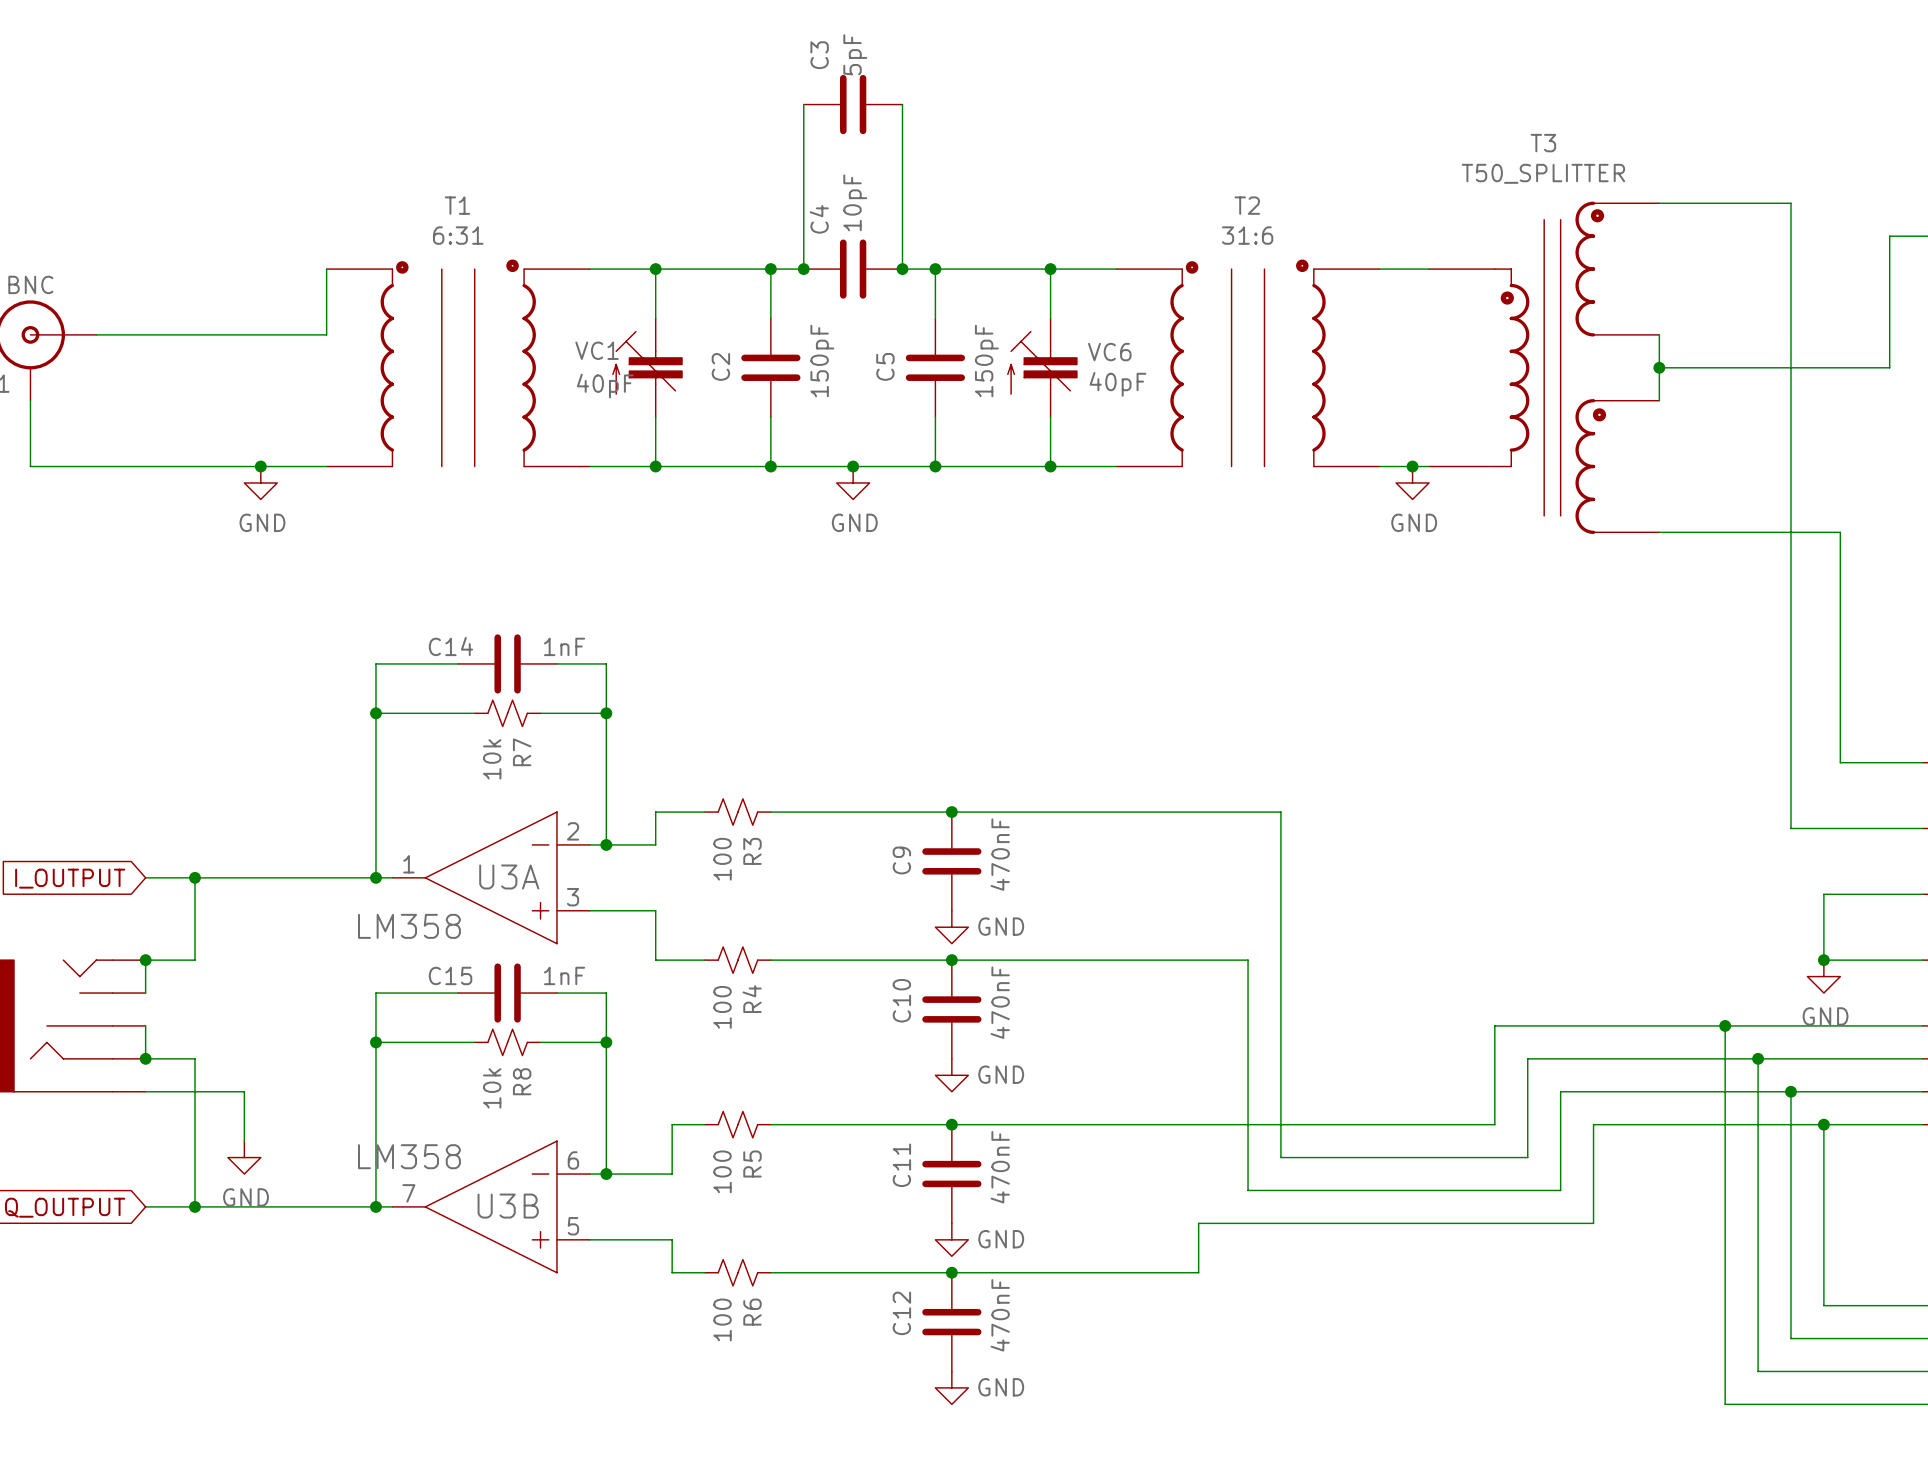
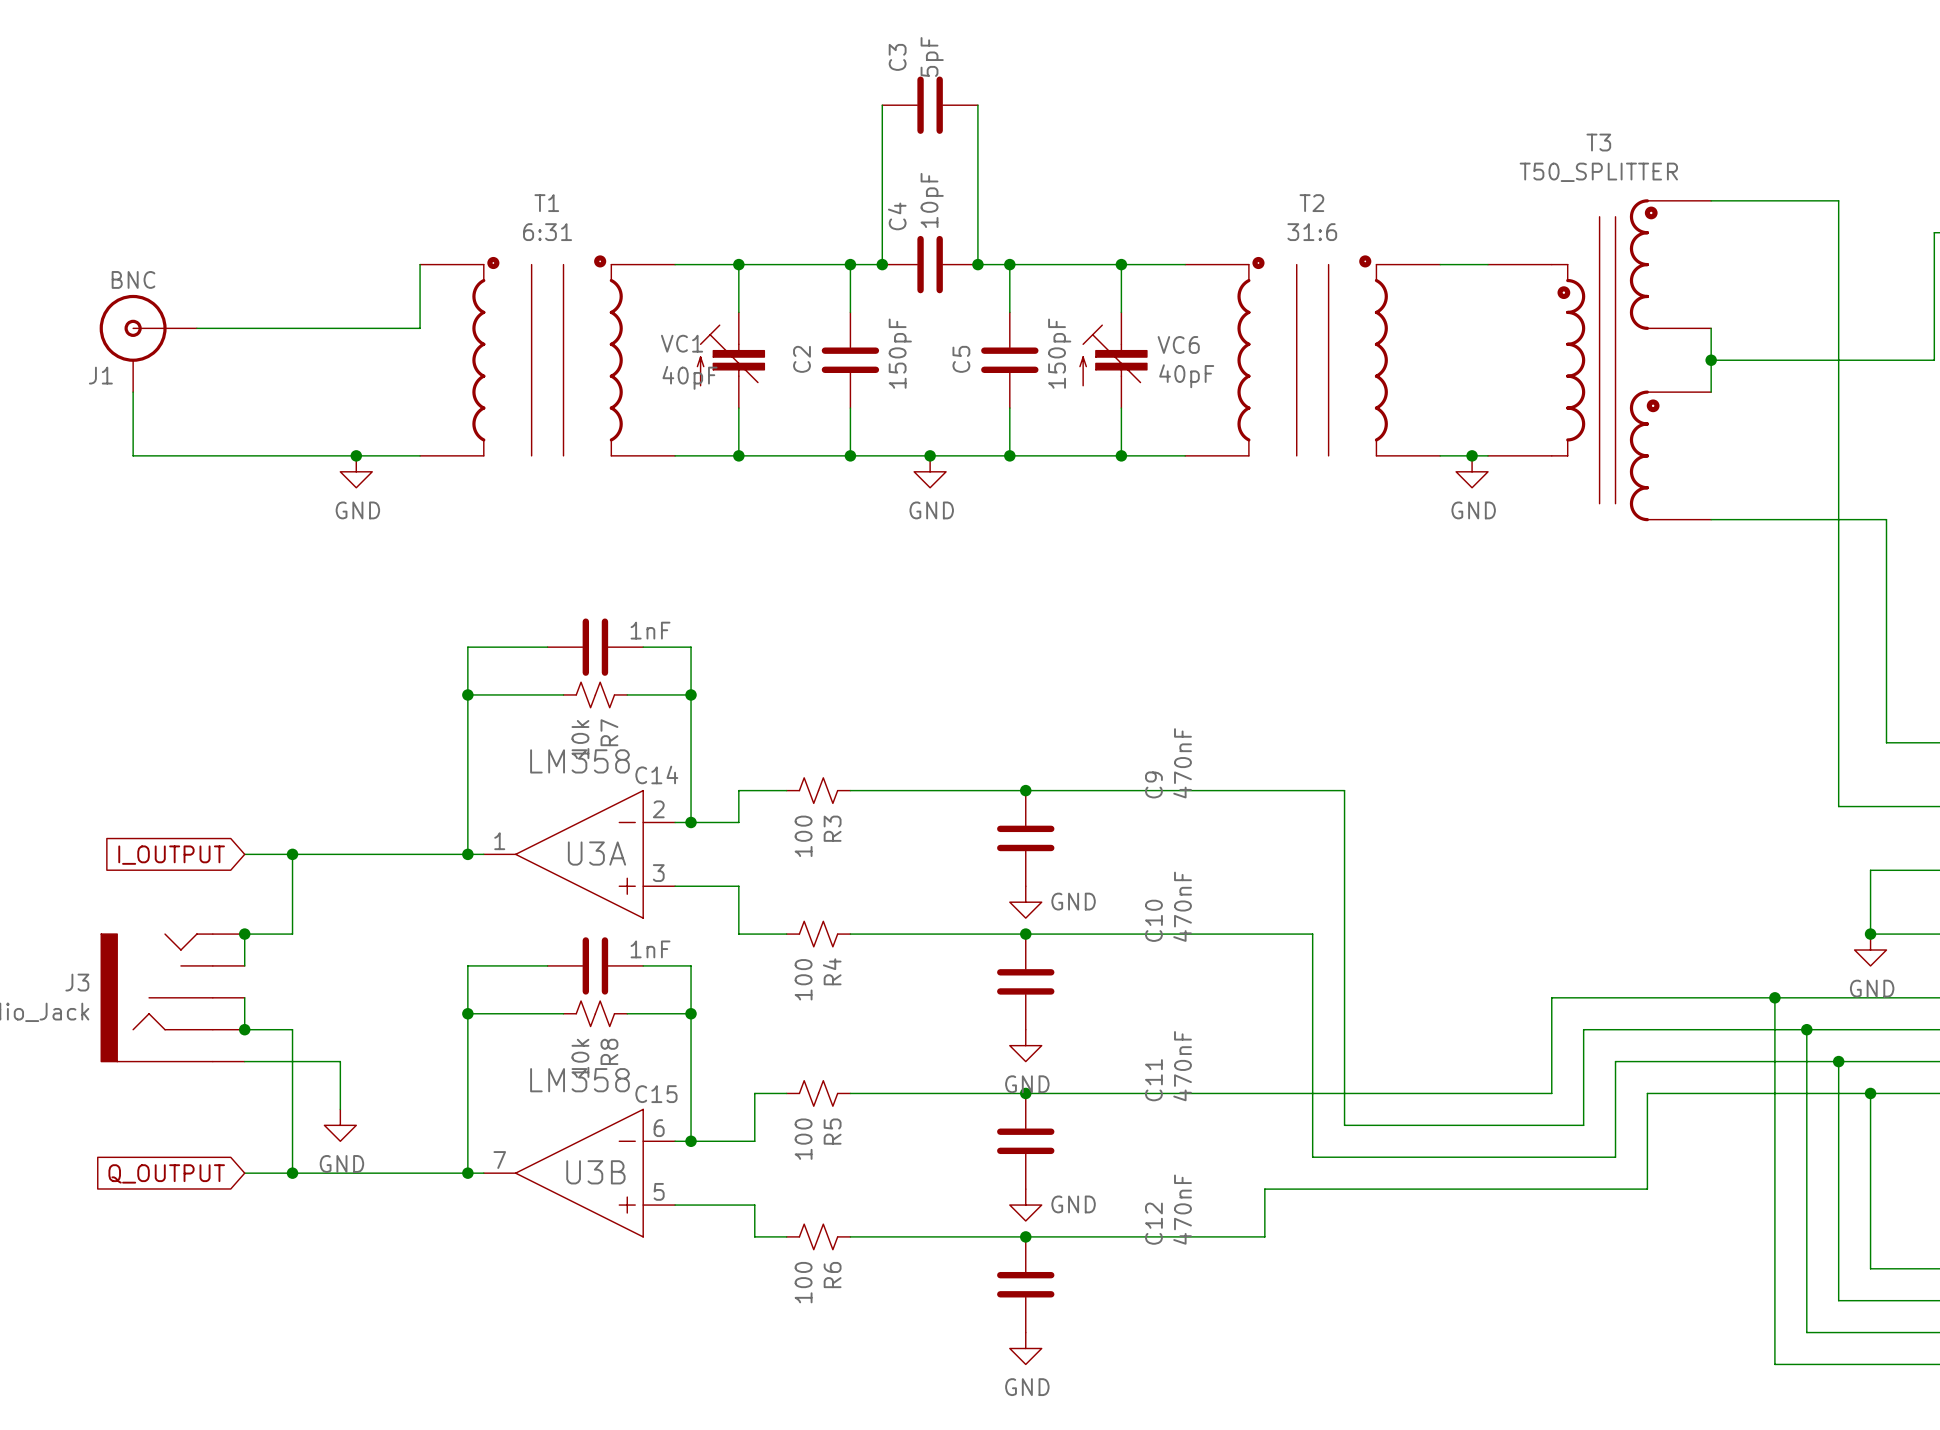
C14 name position: C14 (450, 646) -> C14 (656, 774)
C9 value position: 470nF (1000, 854) -> 470nF (1182, 763)
C9 name position: C9 (901, 860) -> C9 (1153, 784)
U3A value position: LM358 (409, 926) -> LM358 (579, 761)
C15 name position: C15 (450, 975) -> C15 (656, 1094)
C10 name position: C10 (901, 1000) -> C10 (1153, 920)
C10 value position: 470nF (1000, 1002) -> 470nF (1182, 906)
power symbol text position: GND (1001, 1074) -> GND (1027, 1084)
U3B value position: LM358 (409, 1156) -> LM358 (579, 1080)
C11 name position: C11 (901, 1165) -> C11 (1153, 1080)
C11 value position: 470nF (1000, 1167) -> 470nF (1182, 1066)
C12 name position: C12 (901, 1313) -> C12 (1153, 1223)
C12 value position: 470nF (1000, 1315) -> 470nF (1182, 1209)
power symbol text position: GND (1001, 1387) -> GND (1027, 1387)

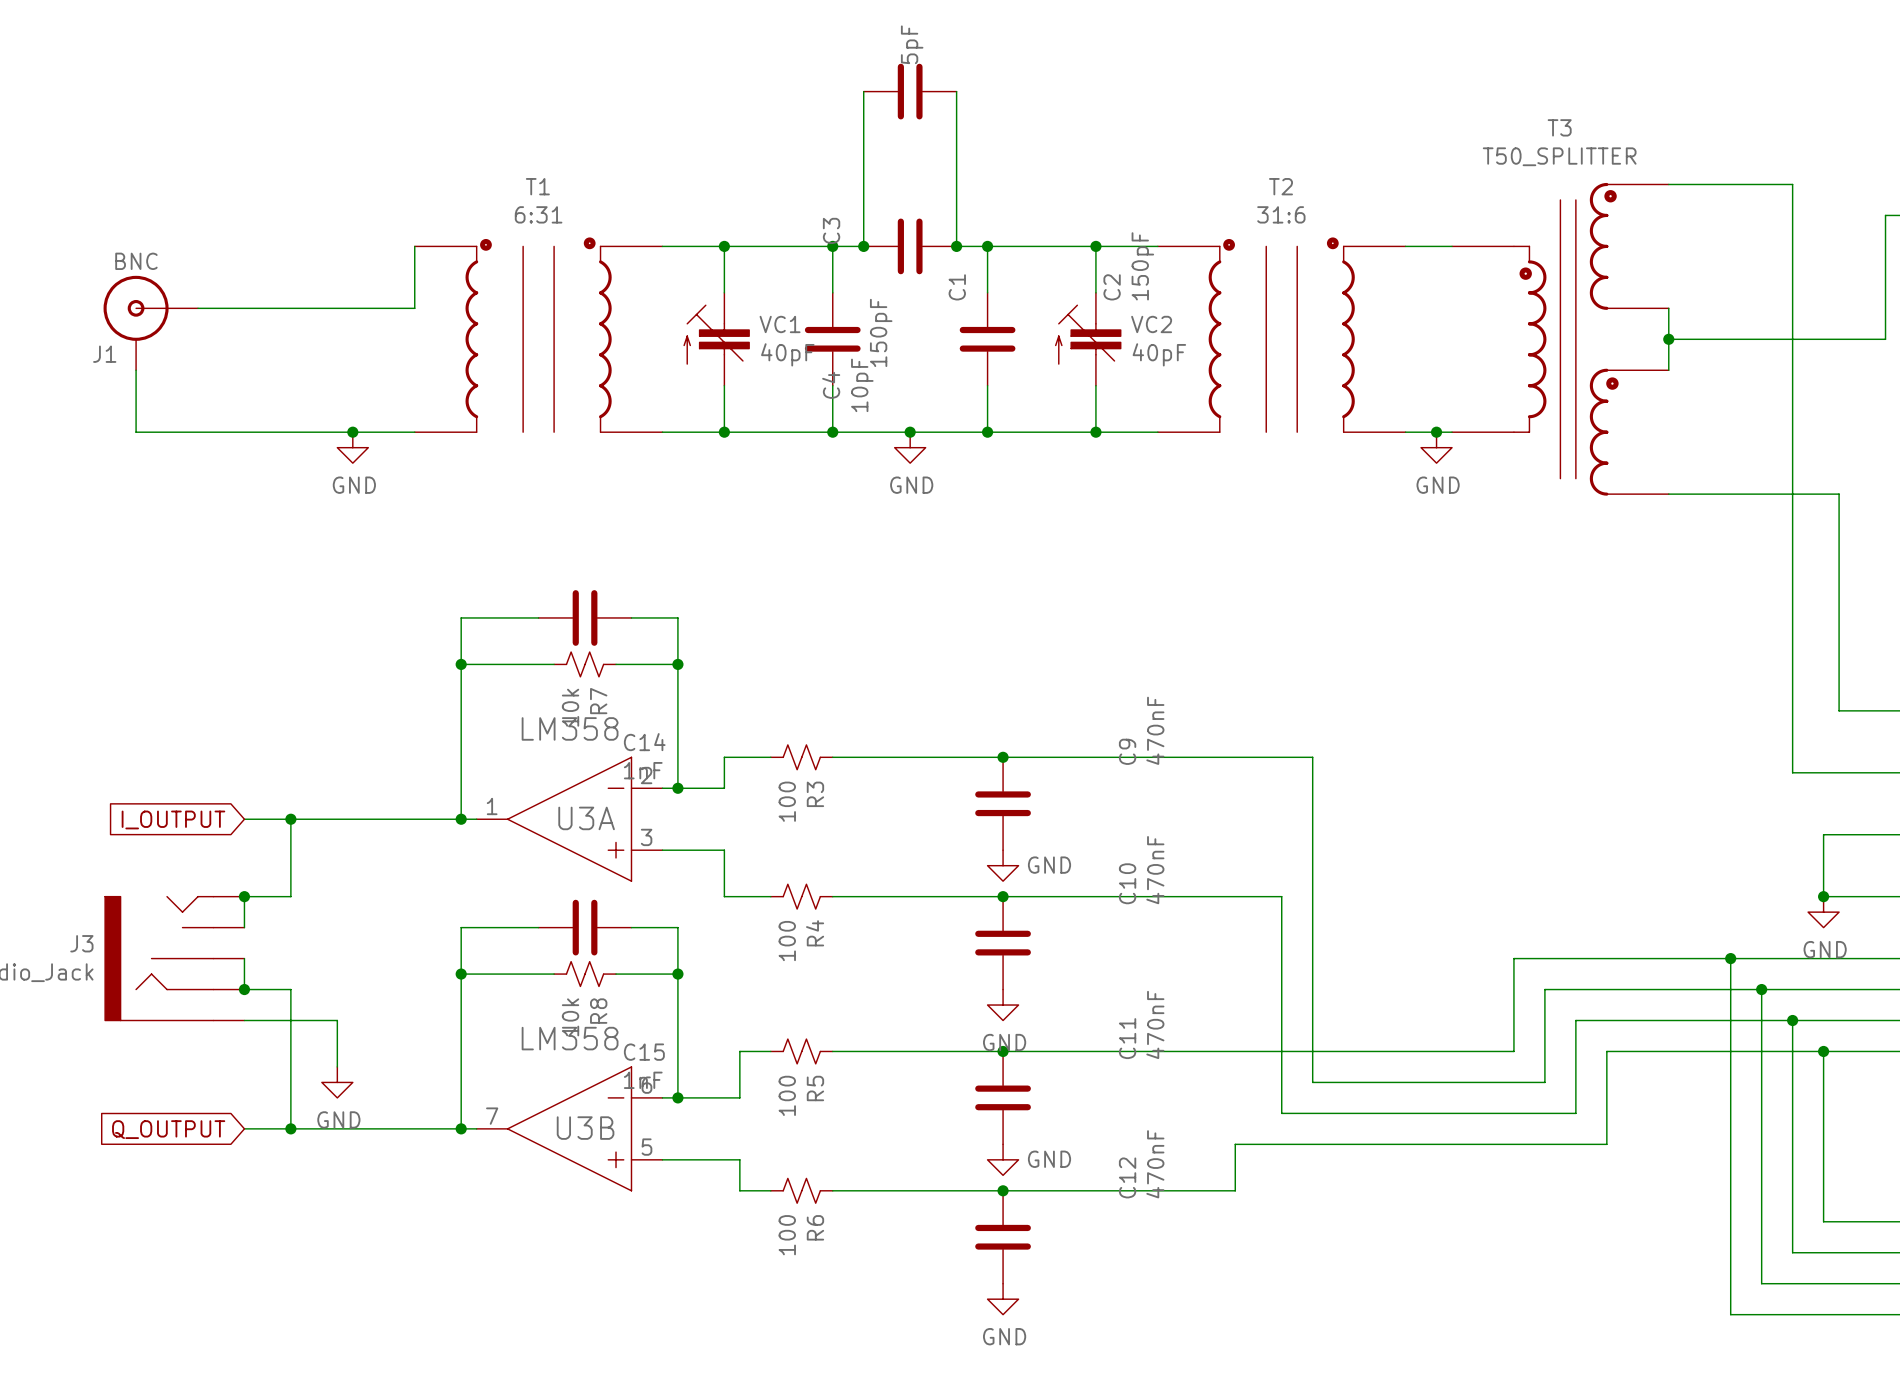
C3 name position: C3 (897, 57) -> C3 (831, 230)
C4 value position: 10pF (932, 200) -> 10pF (862, 385)
C4 name position: C4 (897, 216) -> C4 (831, 385)
VC1 name position: VC1 (682, 343) -> VC1 (780, 324)
VC6 name: VC6 (1178, 344) -> VC2 (1151, 324)
C5 value position: 150pF (1059, 353) -> 150pF (1142, 266)
C2 name: C2 (802, 359) -> C1 (957, 287)
C5 name: C5 (961, 359) -> C2 (1112, 287)
VC1 value position: 40pF (690, 377) -> 40pF (787, 354)
C14 value position: 1nF (650, 630) -> 1nF (643, 770)
C15 value position: 1nF (650, 949) -> 1nF (643, 1080)

